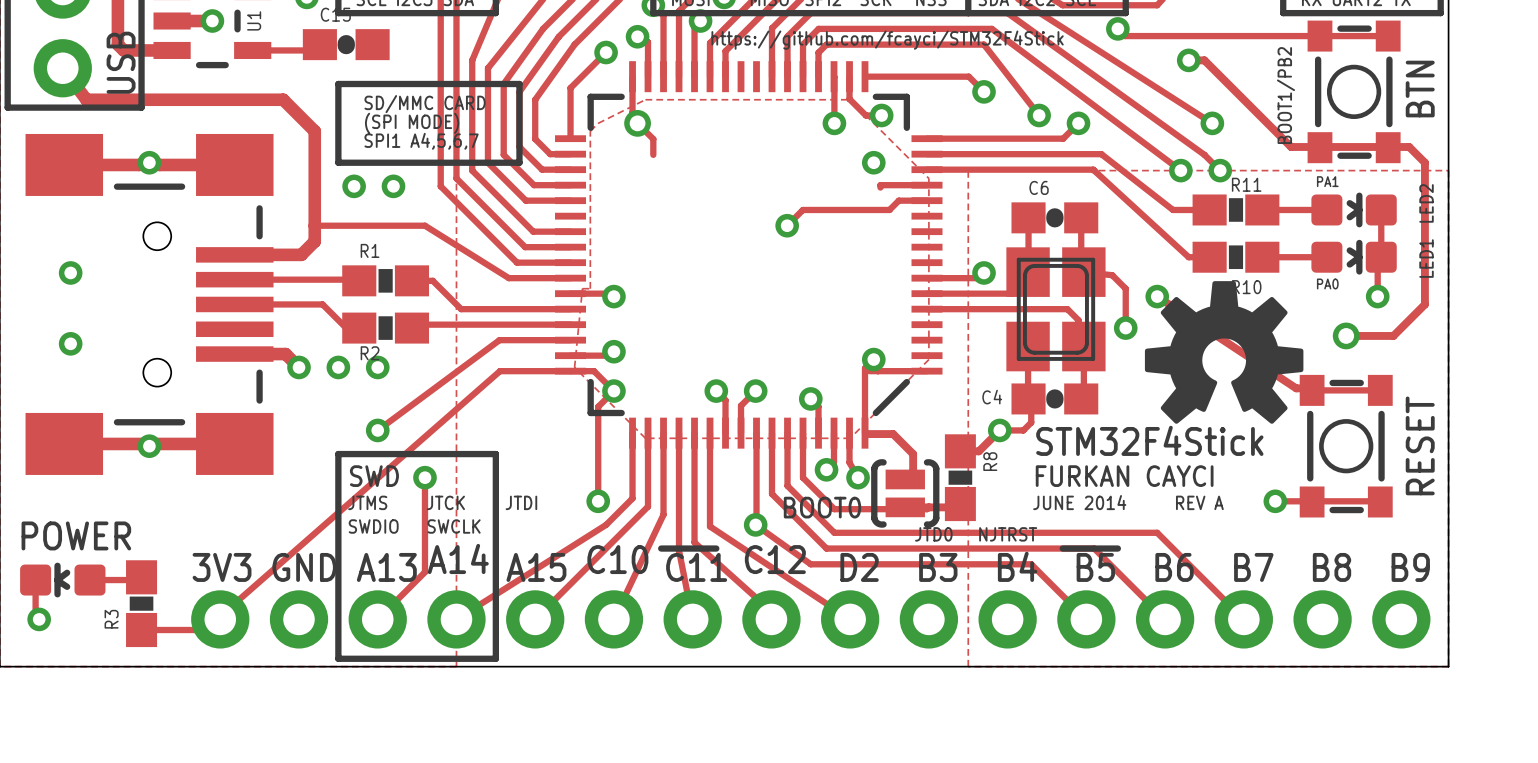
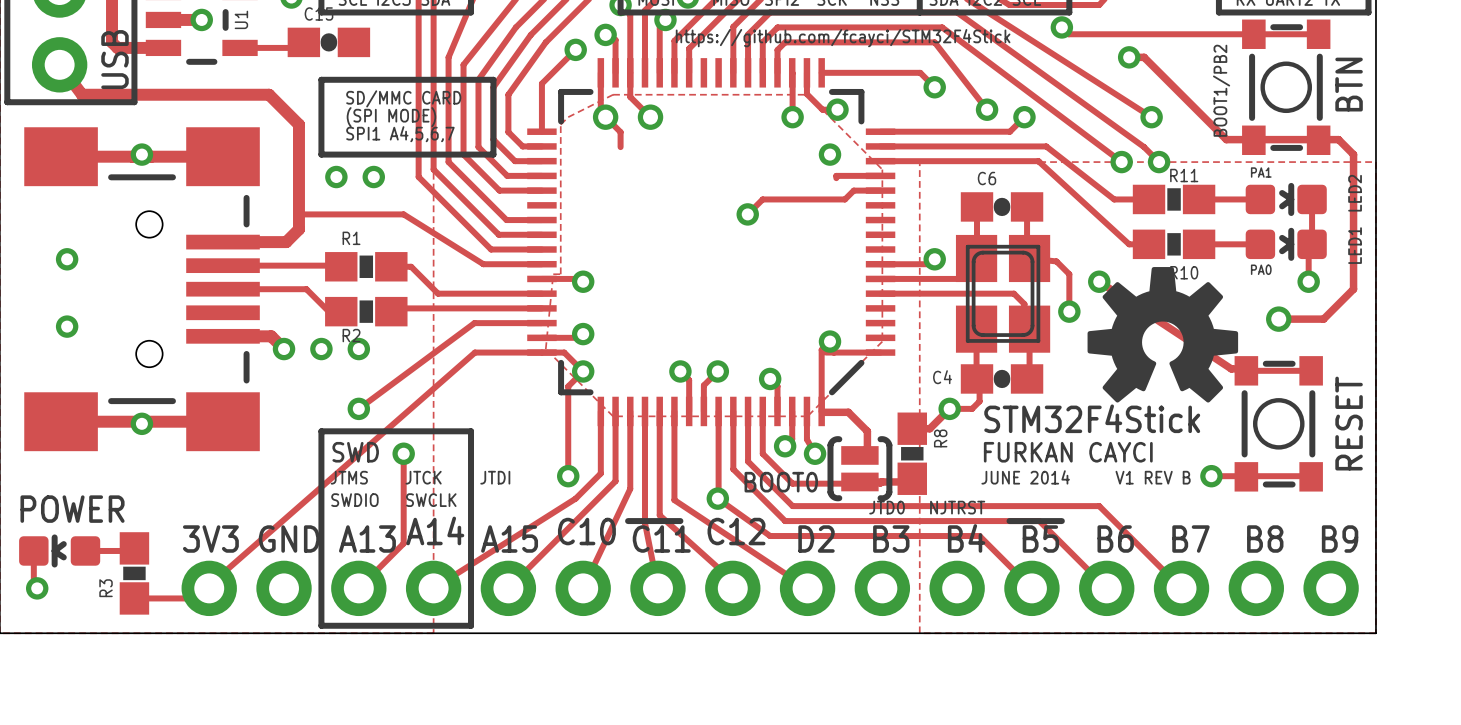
track: none -> (630, 72) (630, 96) (650, 117)
via: none -> (650, 117)
text: REV A (1199, 502) -> V1 REV B (1153, 477)

